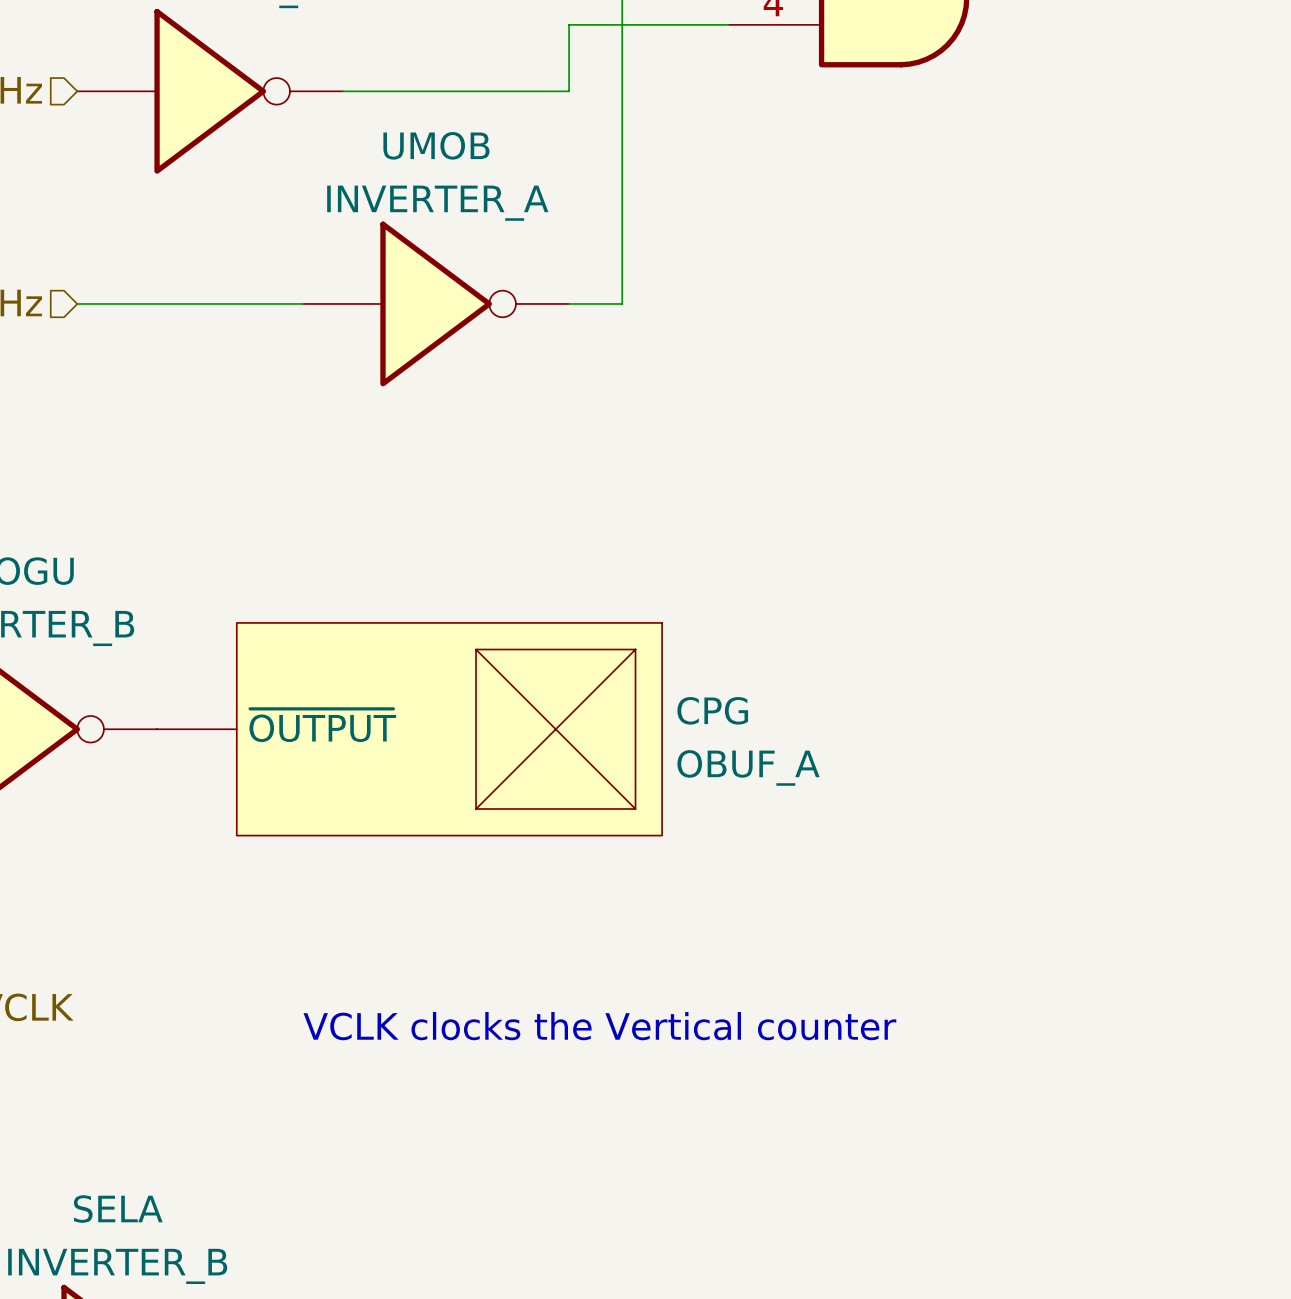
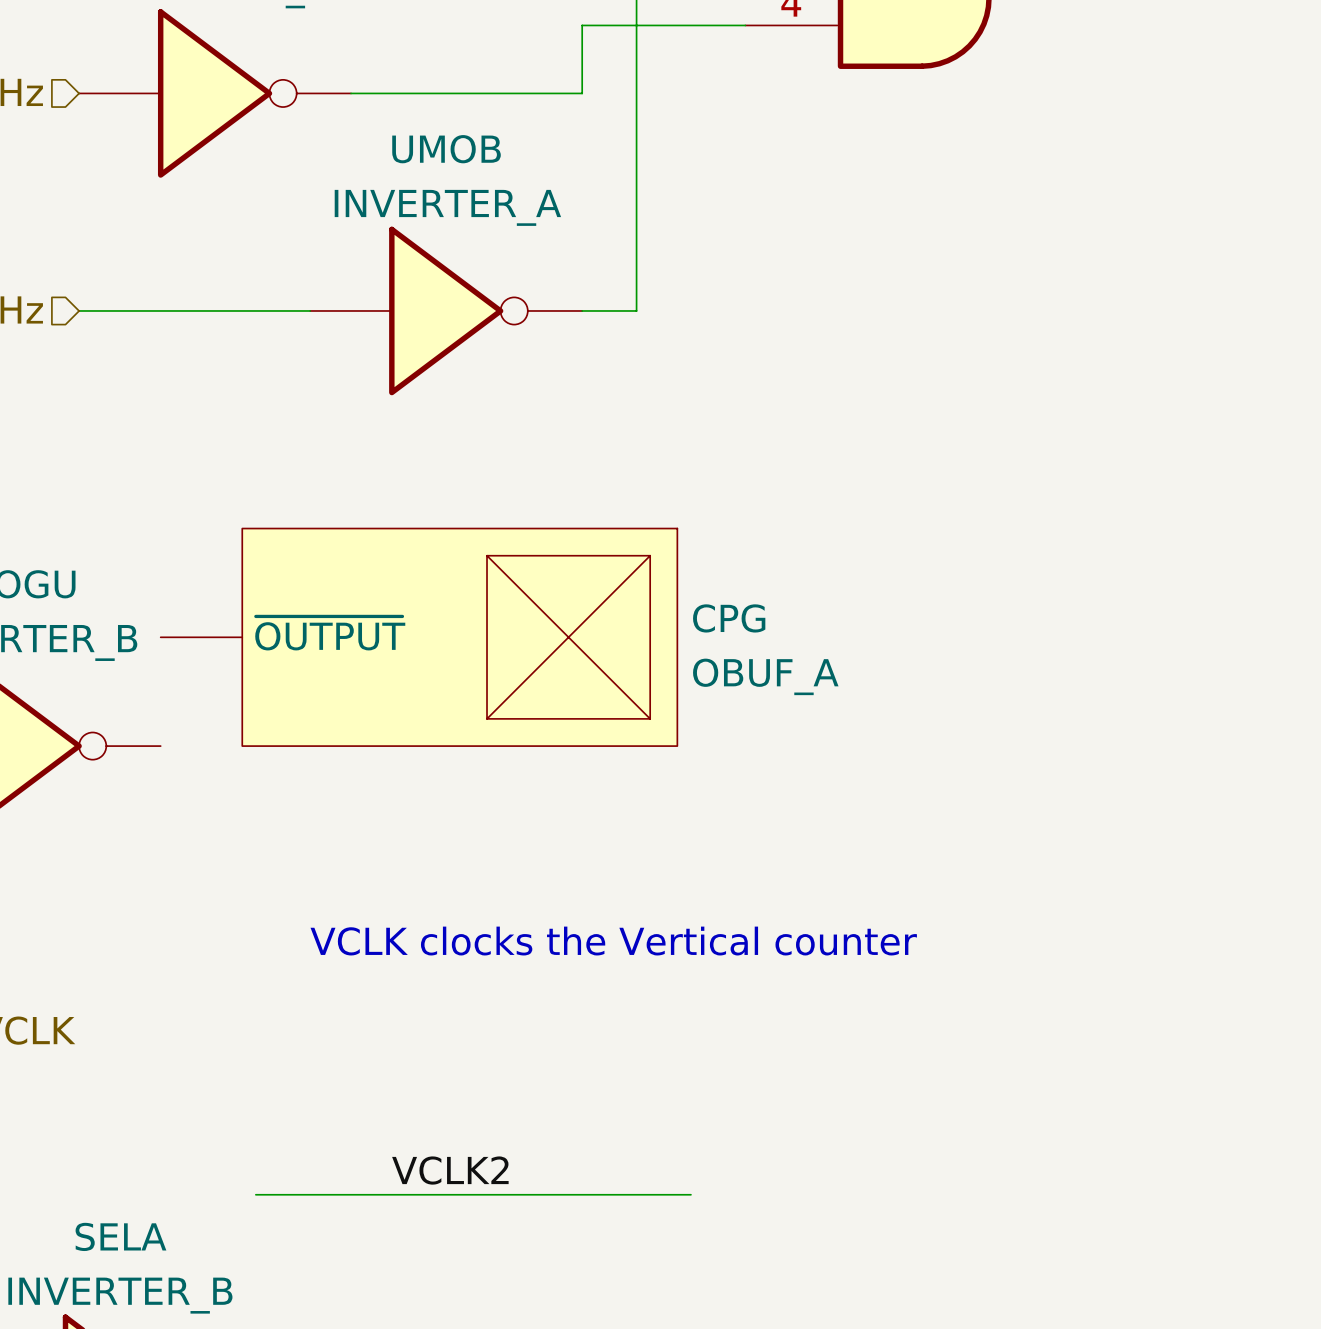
CPG position: (409, 729) -> (419, 637)
text position: VCLK clocks the Vertical counter (599, 1026) -> VCLK clocks the Vertical counter (613, 941)
label: none -> VCLK2 (450, 1170)
wire: none -> (255, 1194) (690, 1194)

